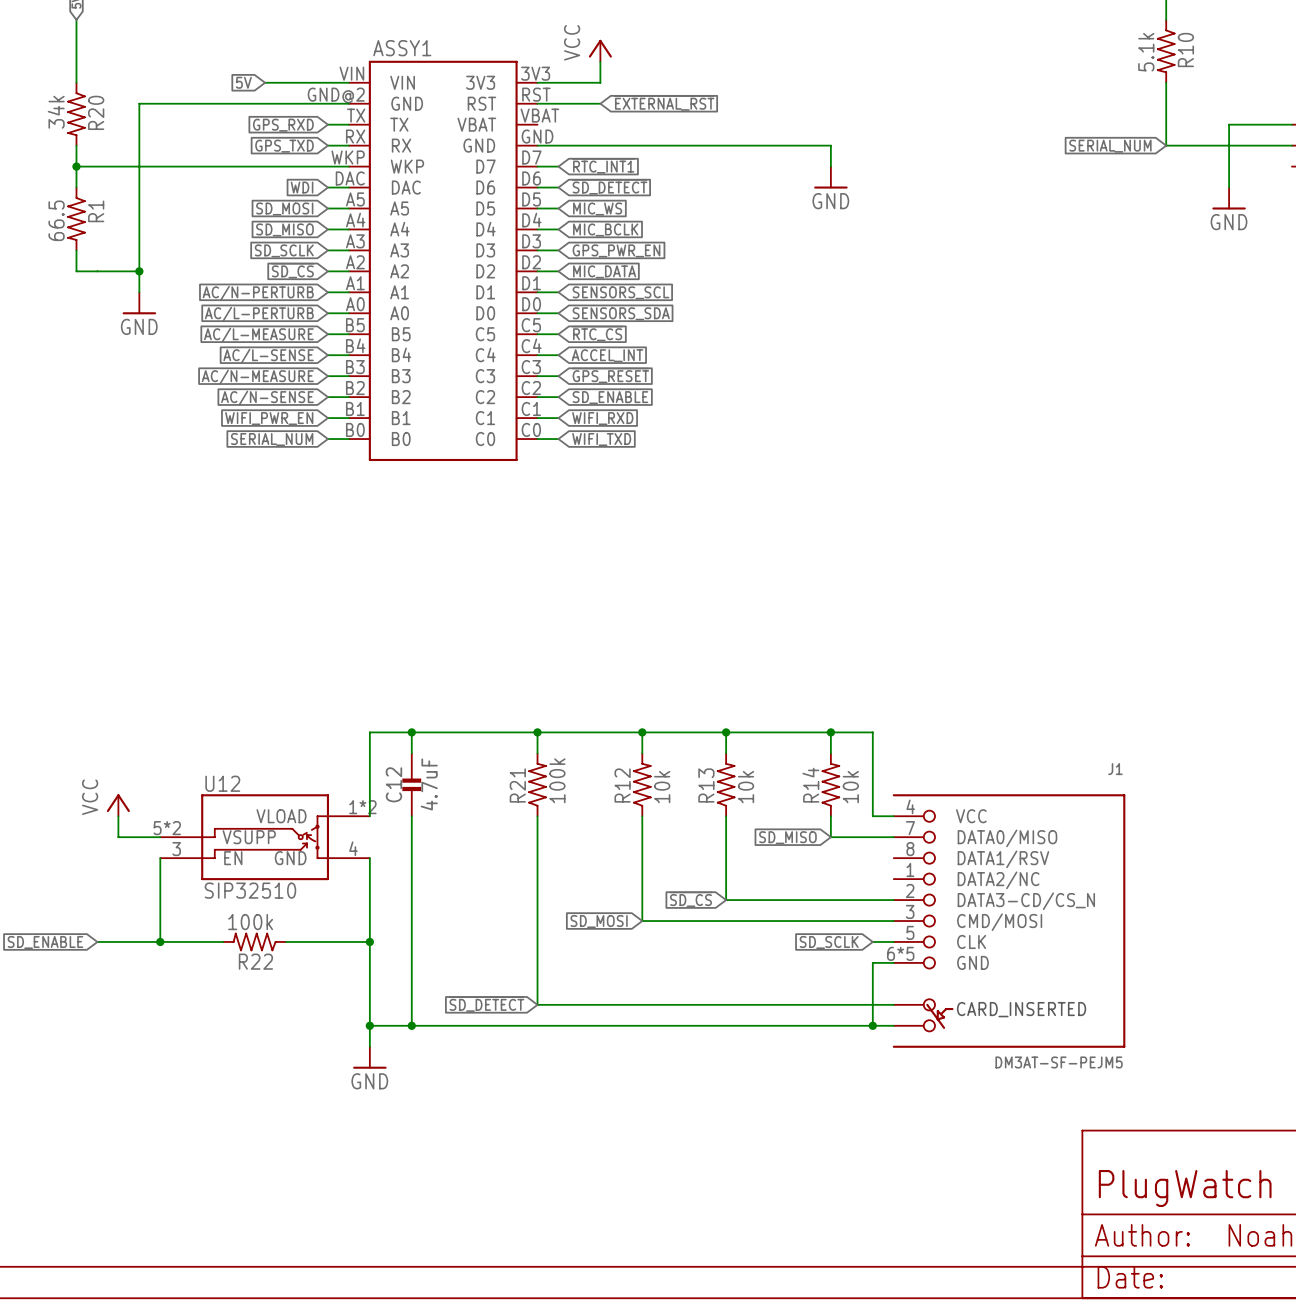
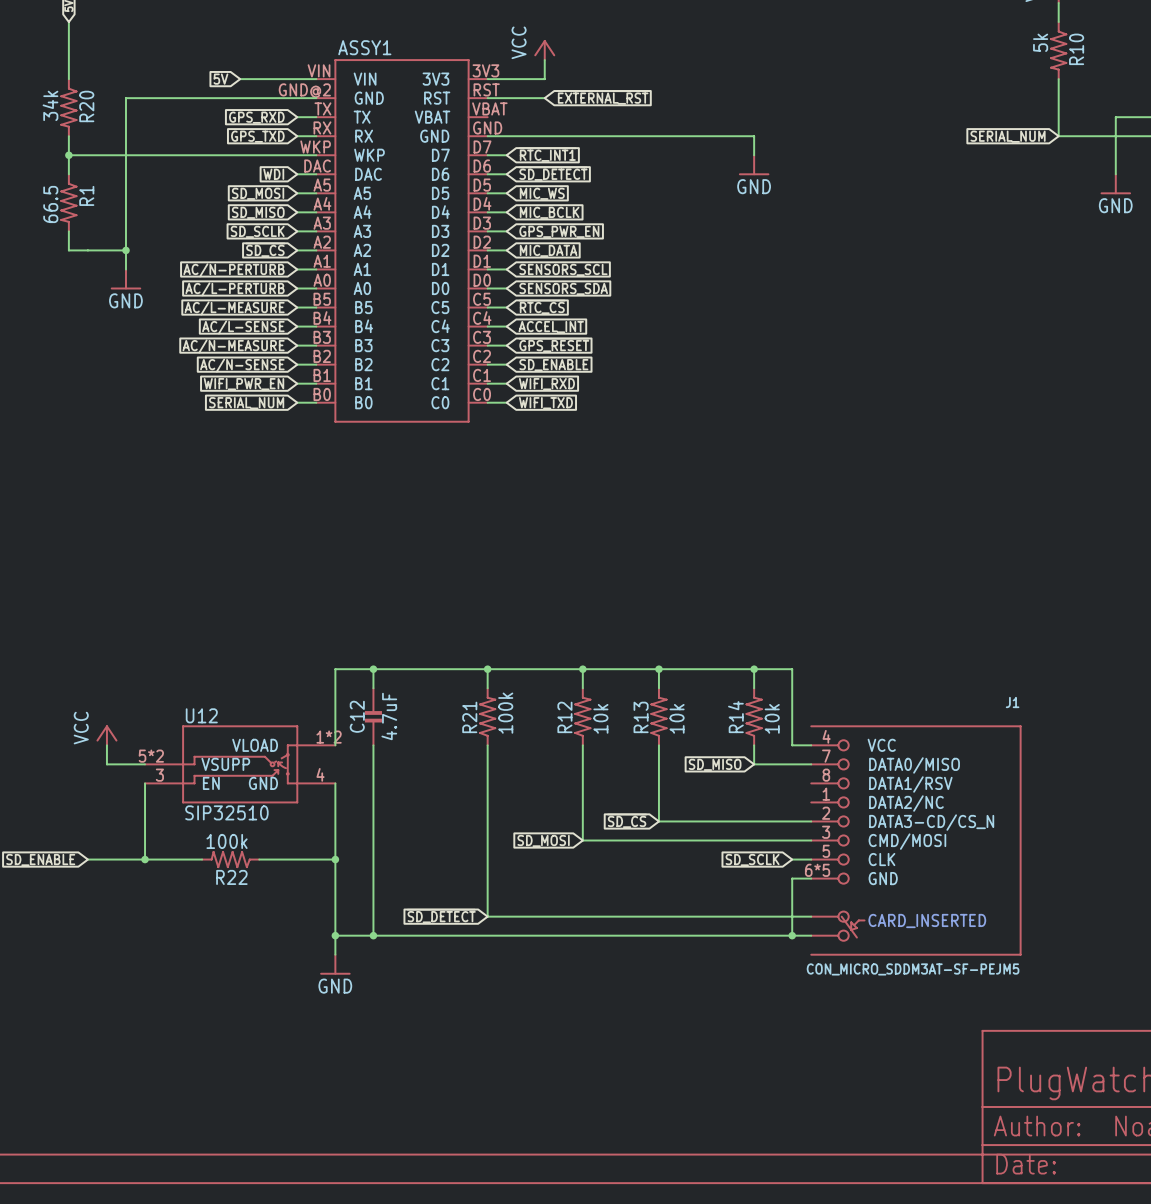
R10 value: 5.1k (1146, 52) -> 5k (1040, 42)
J1 value: DM3AT-SF-PEJM5 (1059, 1062) -> CON_MICRO_SDDM3AT-SF-PEJM5 (913, 969)

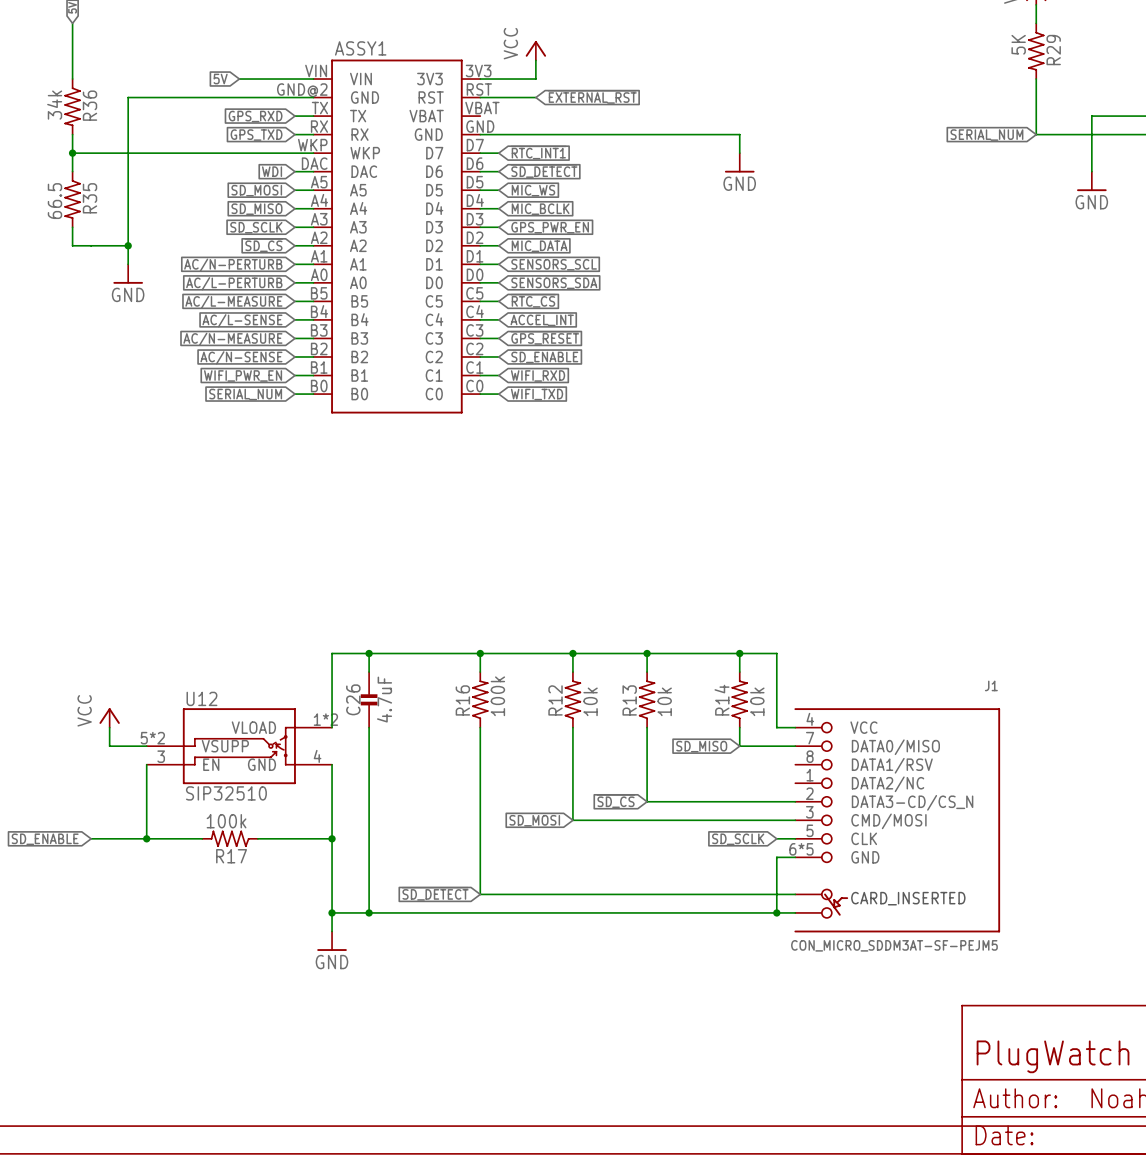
R10 value: 5k (1040, 42) -> 5K (1018, 44)
R10 name: R10 (1076, 49) -> R29 (1053, 50)
R20 name: R20 (86, 106) -> R36 (90, 105)
R1 name: R1 (86, 195) -> R35 (90, 198)
C12 name: C12 (357, 716) -> C26 (353, 699)
R21 name: R21 (469, 717) -> R16 (462, 700)
R22 name: R22 (231, 877) -> R17 (231, 856)

